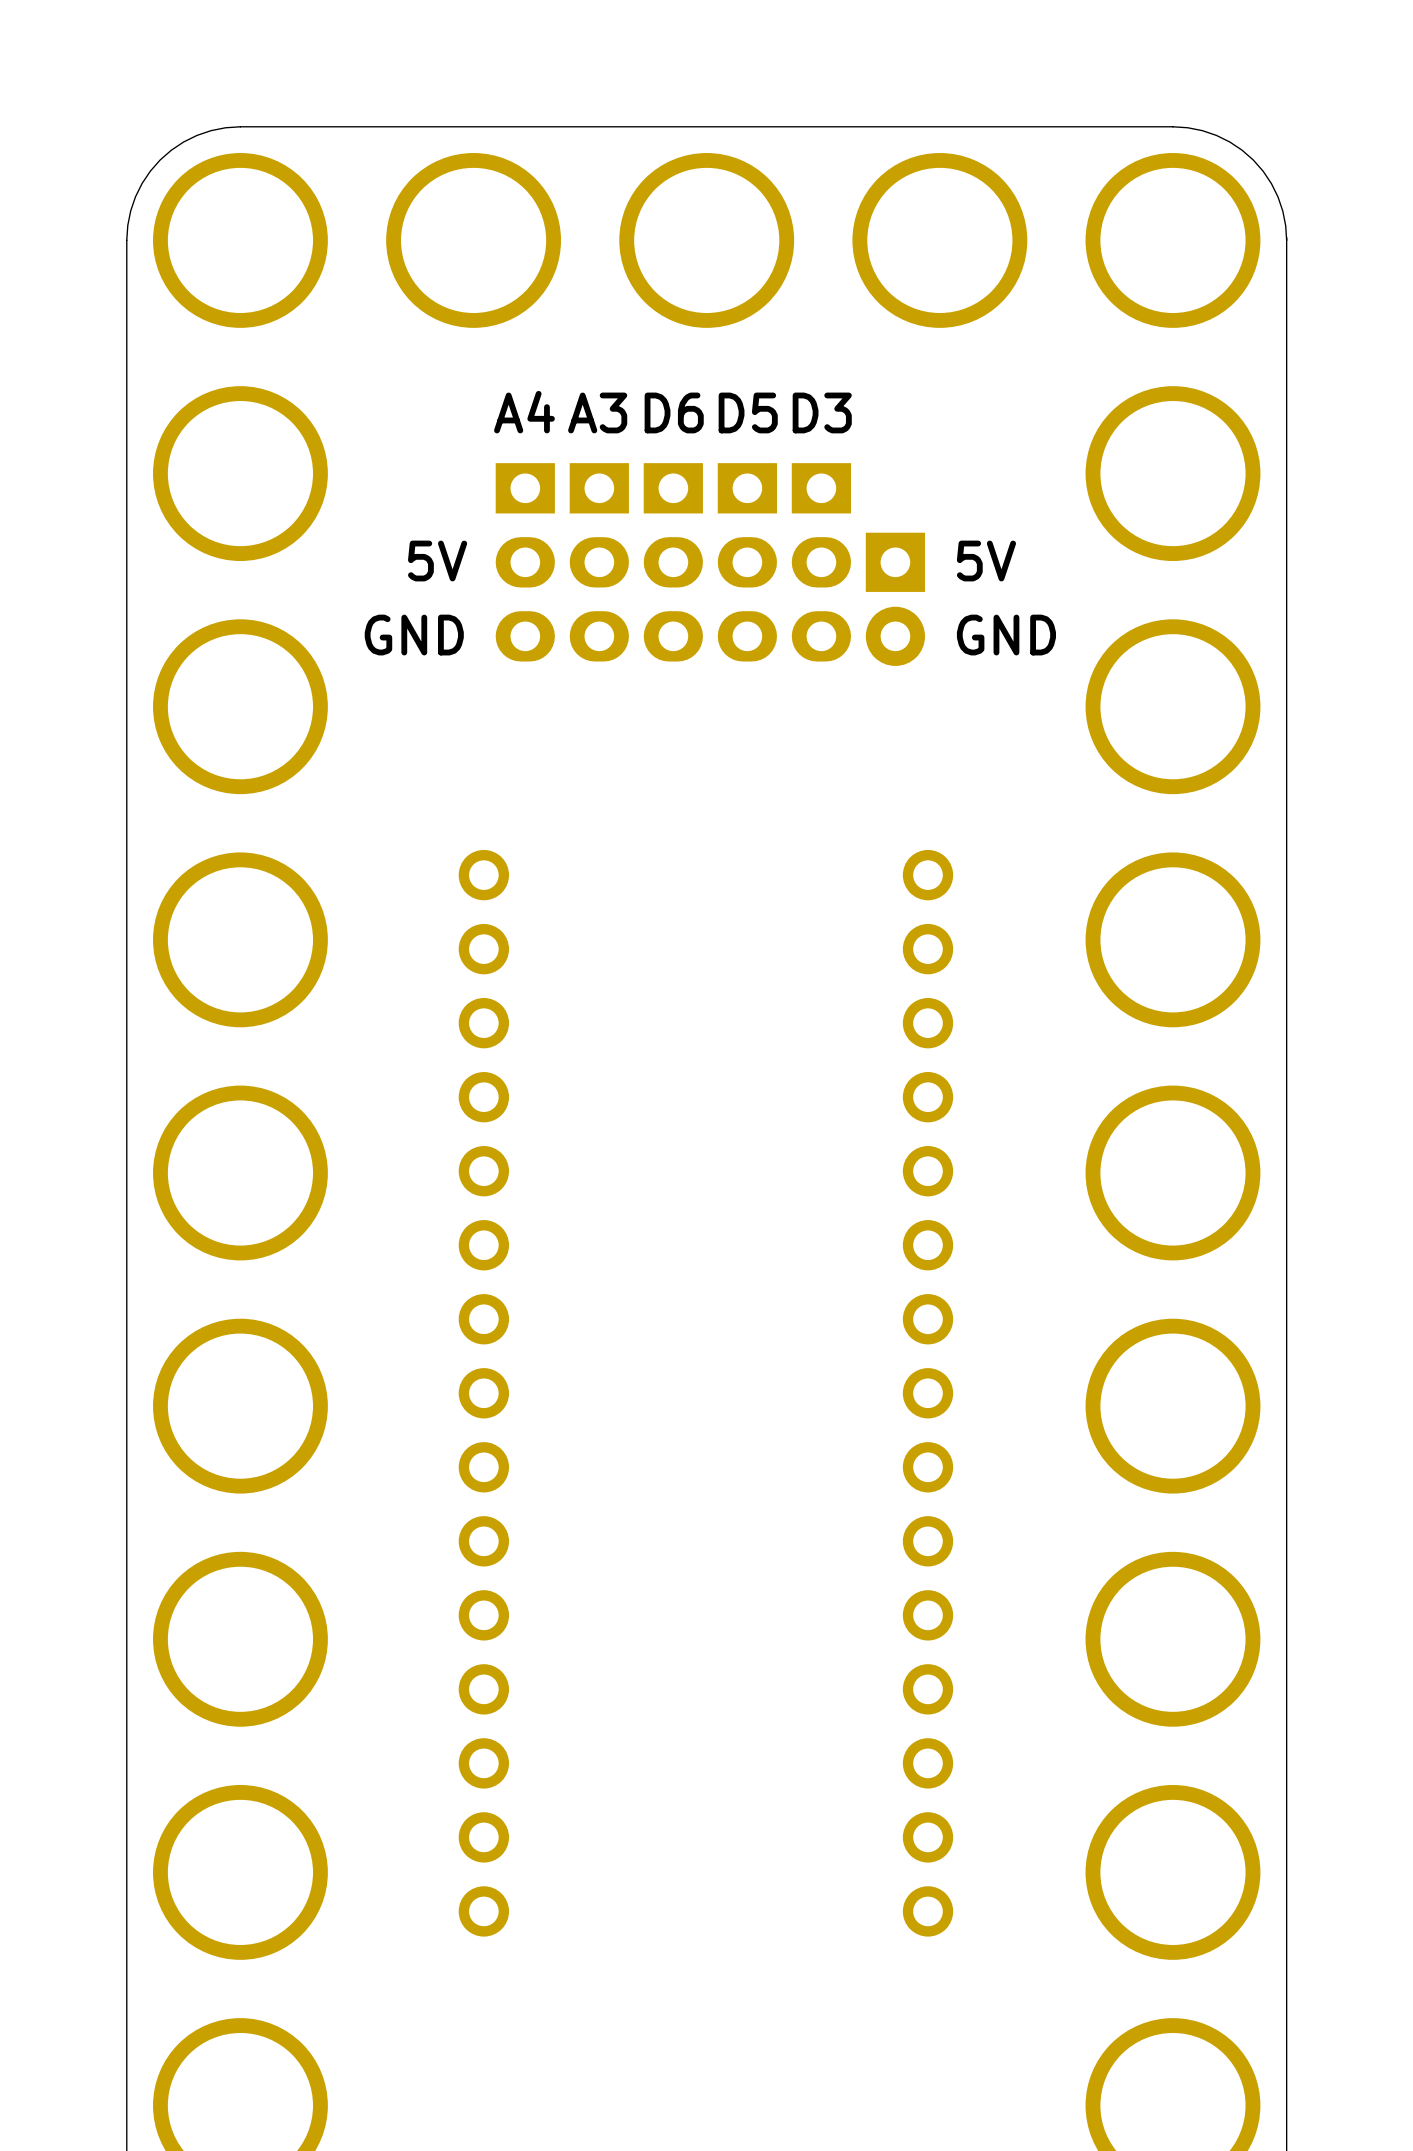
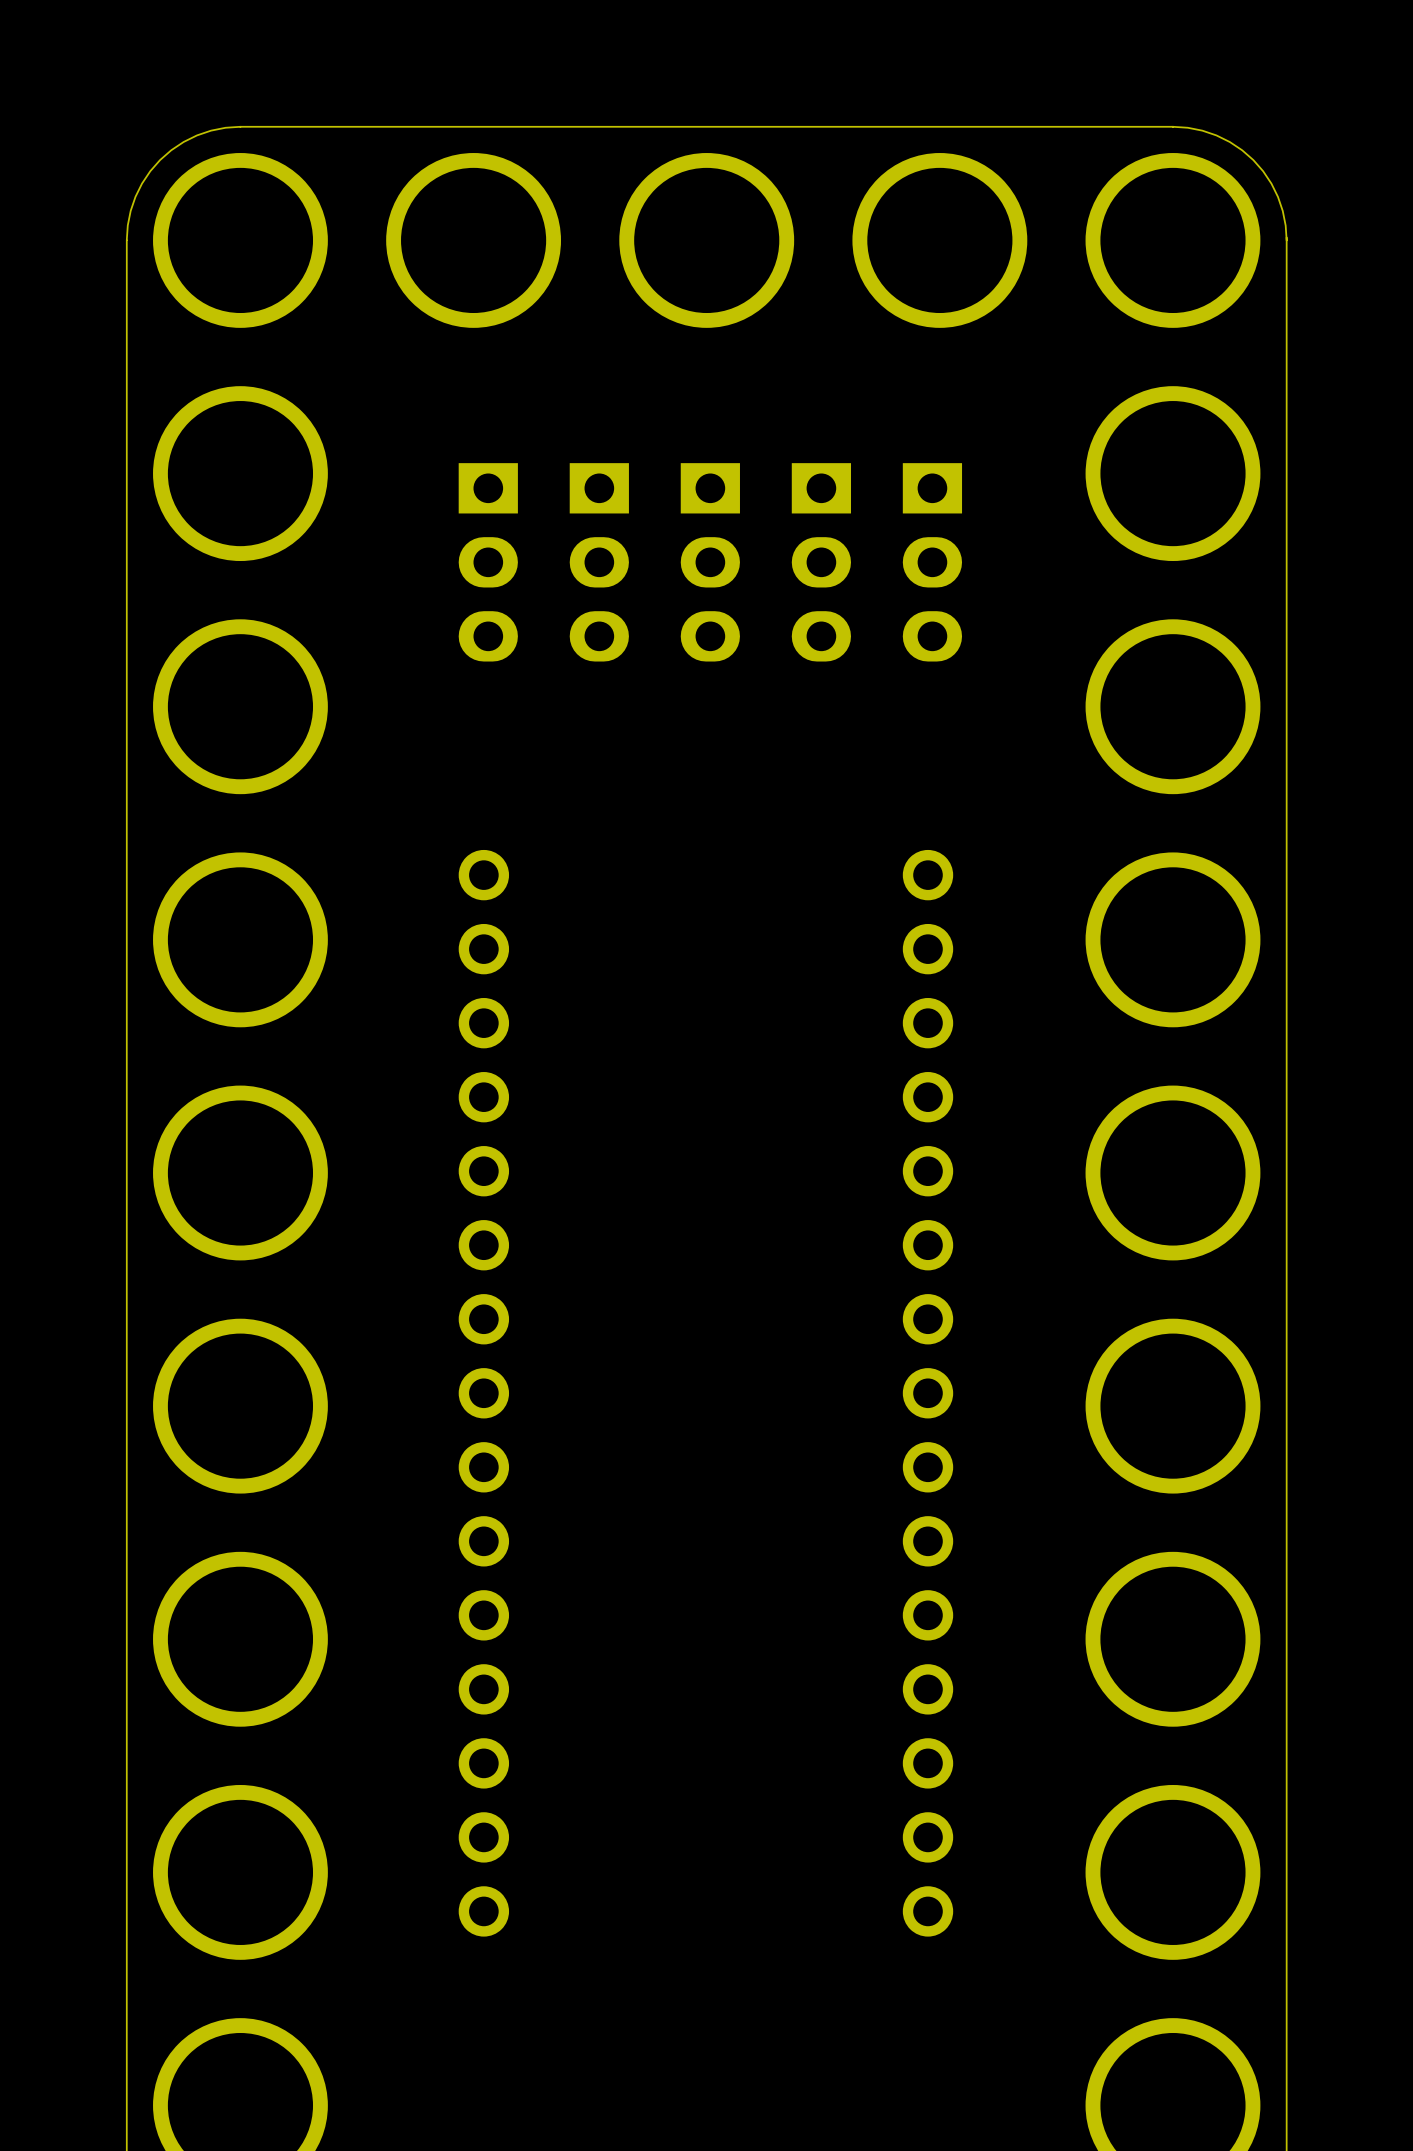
text: A4 (524, 412) -> none
text: A3 (597, 412) -> none
text: D6 (674, 412) -> none
text: D5 (748, 412) -> none
text: D3 (822, 412) -> none
text: 5V (437, 561) -> none
text: 5V (986, 561) -> none
part position: (525, 562) -> (488, 562)
part: (673, 562) -> none
part: none -> (710, 562)
part: (747, 562) -> none
part: none -> (932, 562)
part: (895, 599) -> none
text: GND (414, 635) -> none
text: GND (1006, 635) -> none

